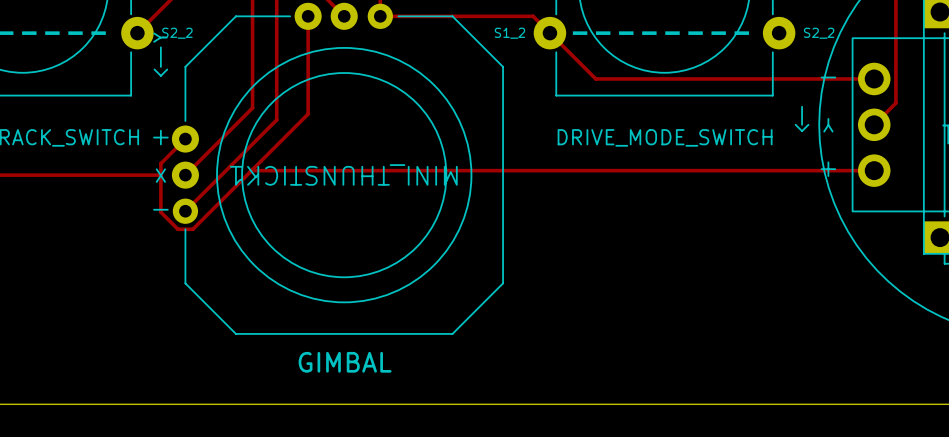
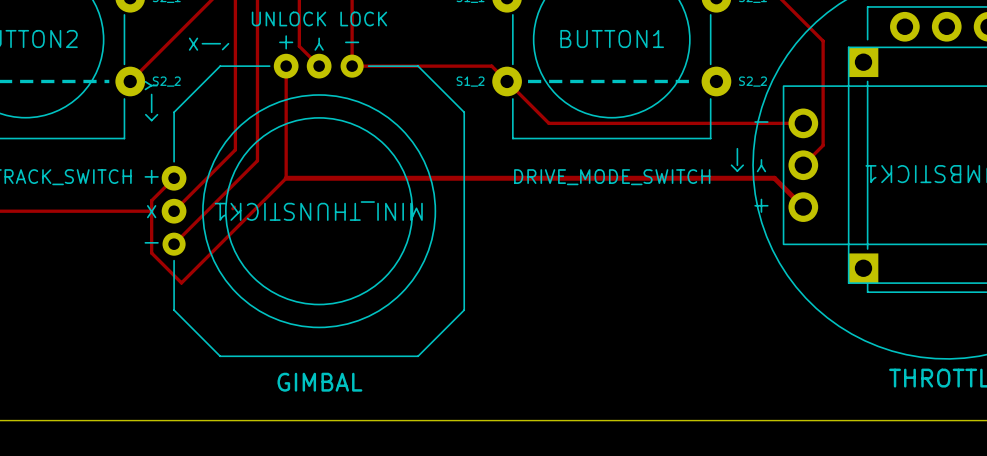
track: (308, 114) (251, 170) (874, 170) -> (286, 178) (774, 178) (803, 207)
track: none -> (286, 155) (286, 178)
track: (249, 172) (192, 229) (177, 229) (160, 212) -> (286, 178) (181, 282) (151, 253) (151, 245)

